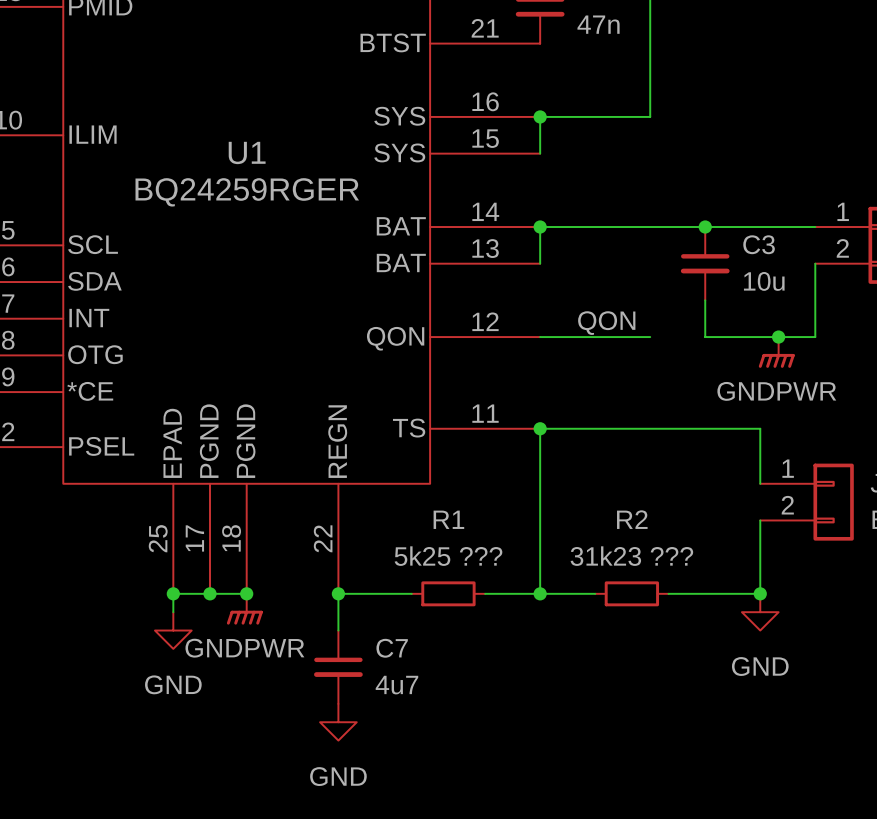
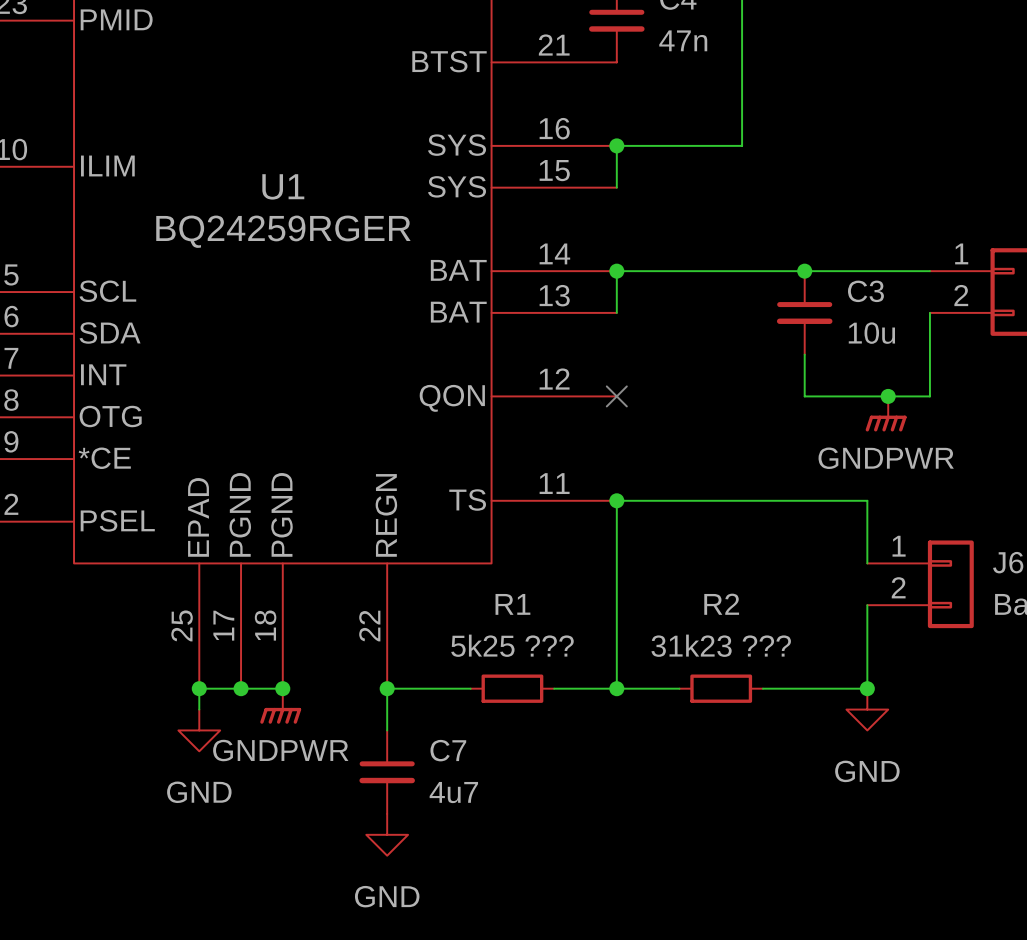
label: QON (606, 323) -> none
wire: (540, 337) (650, 337) -> none
no-connect mark: none -> (616, 396)

